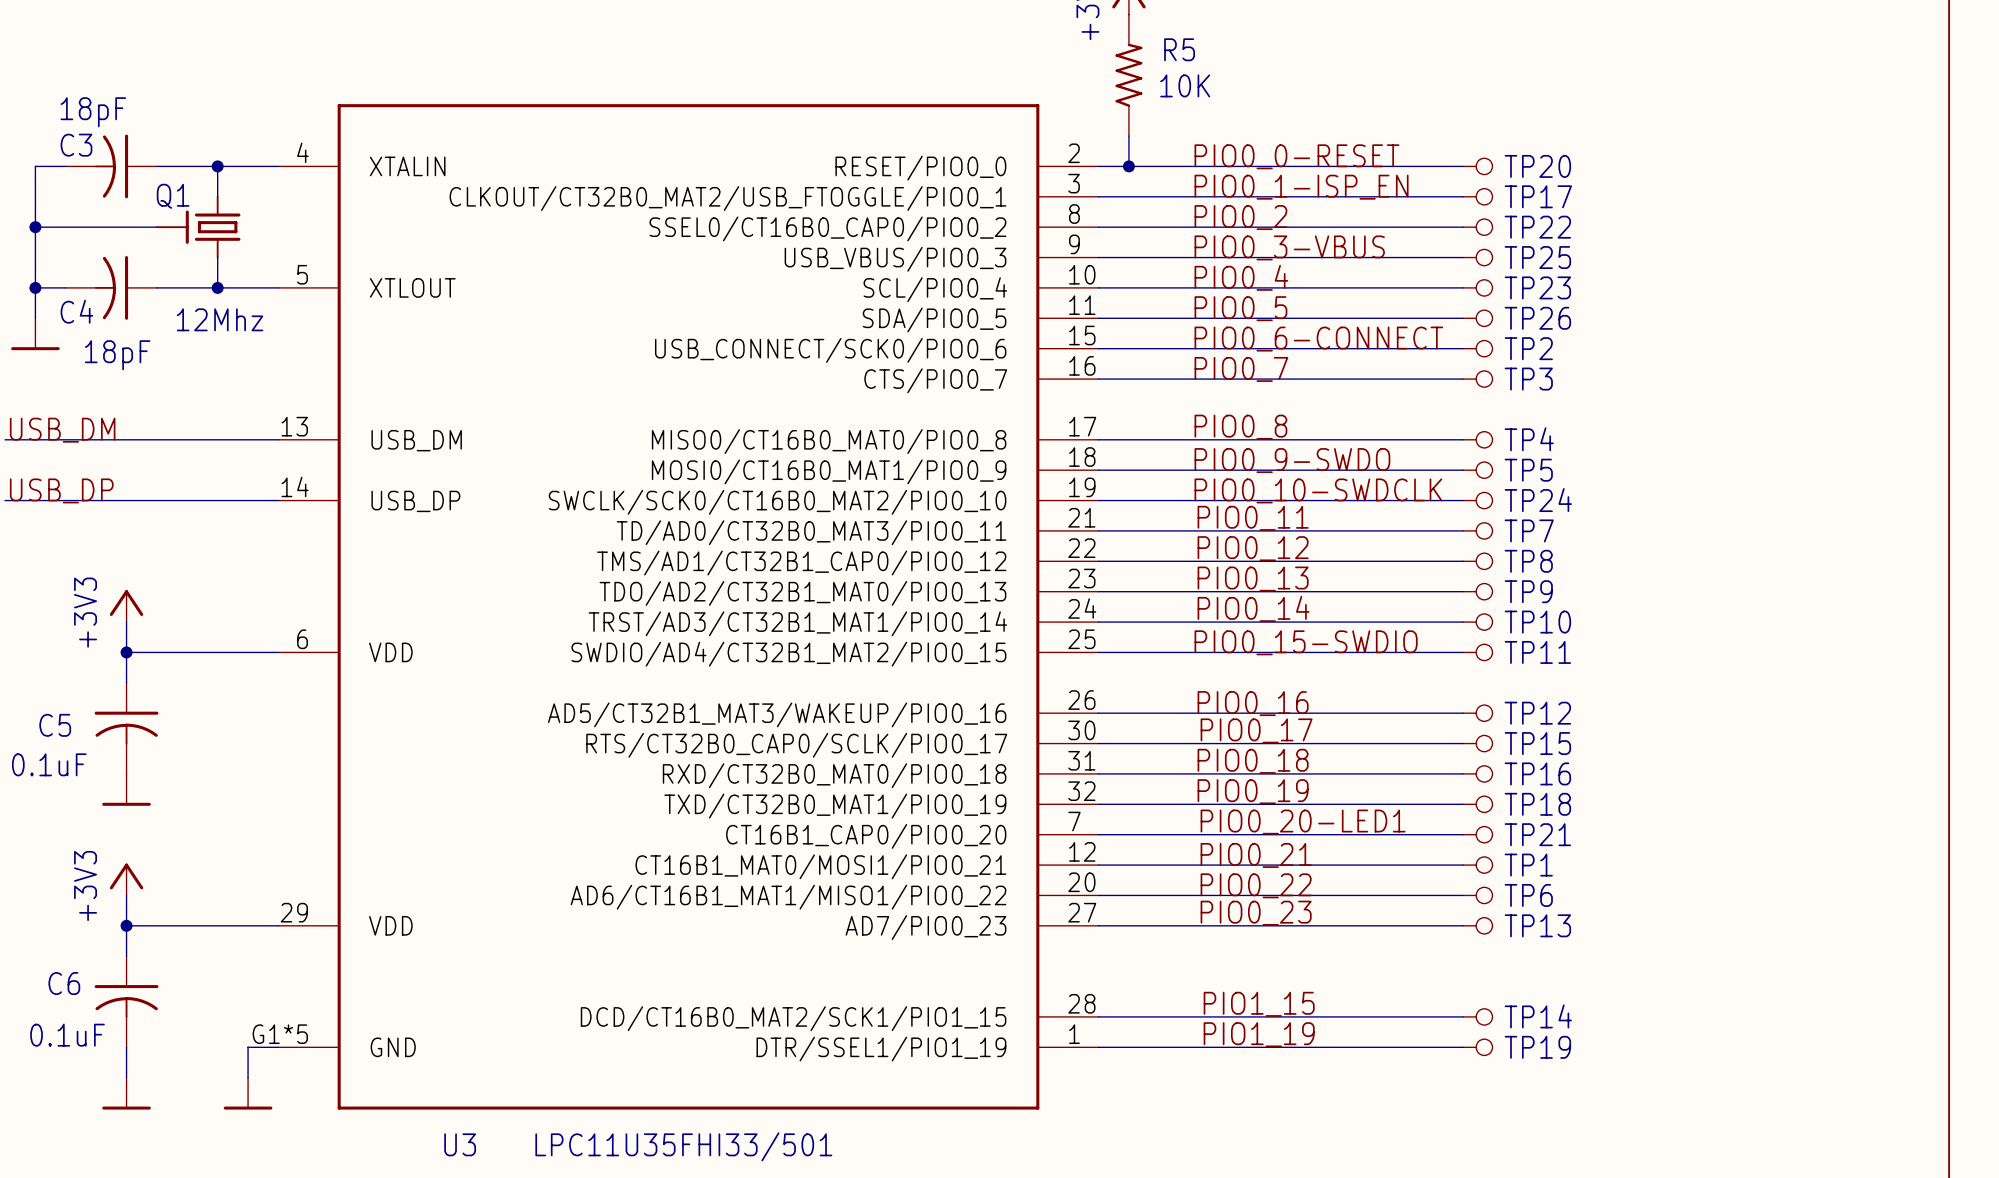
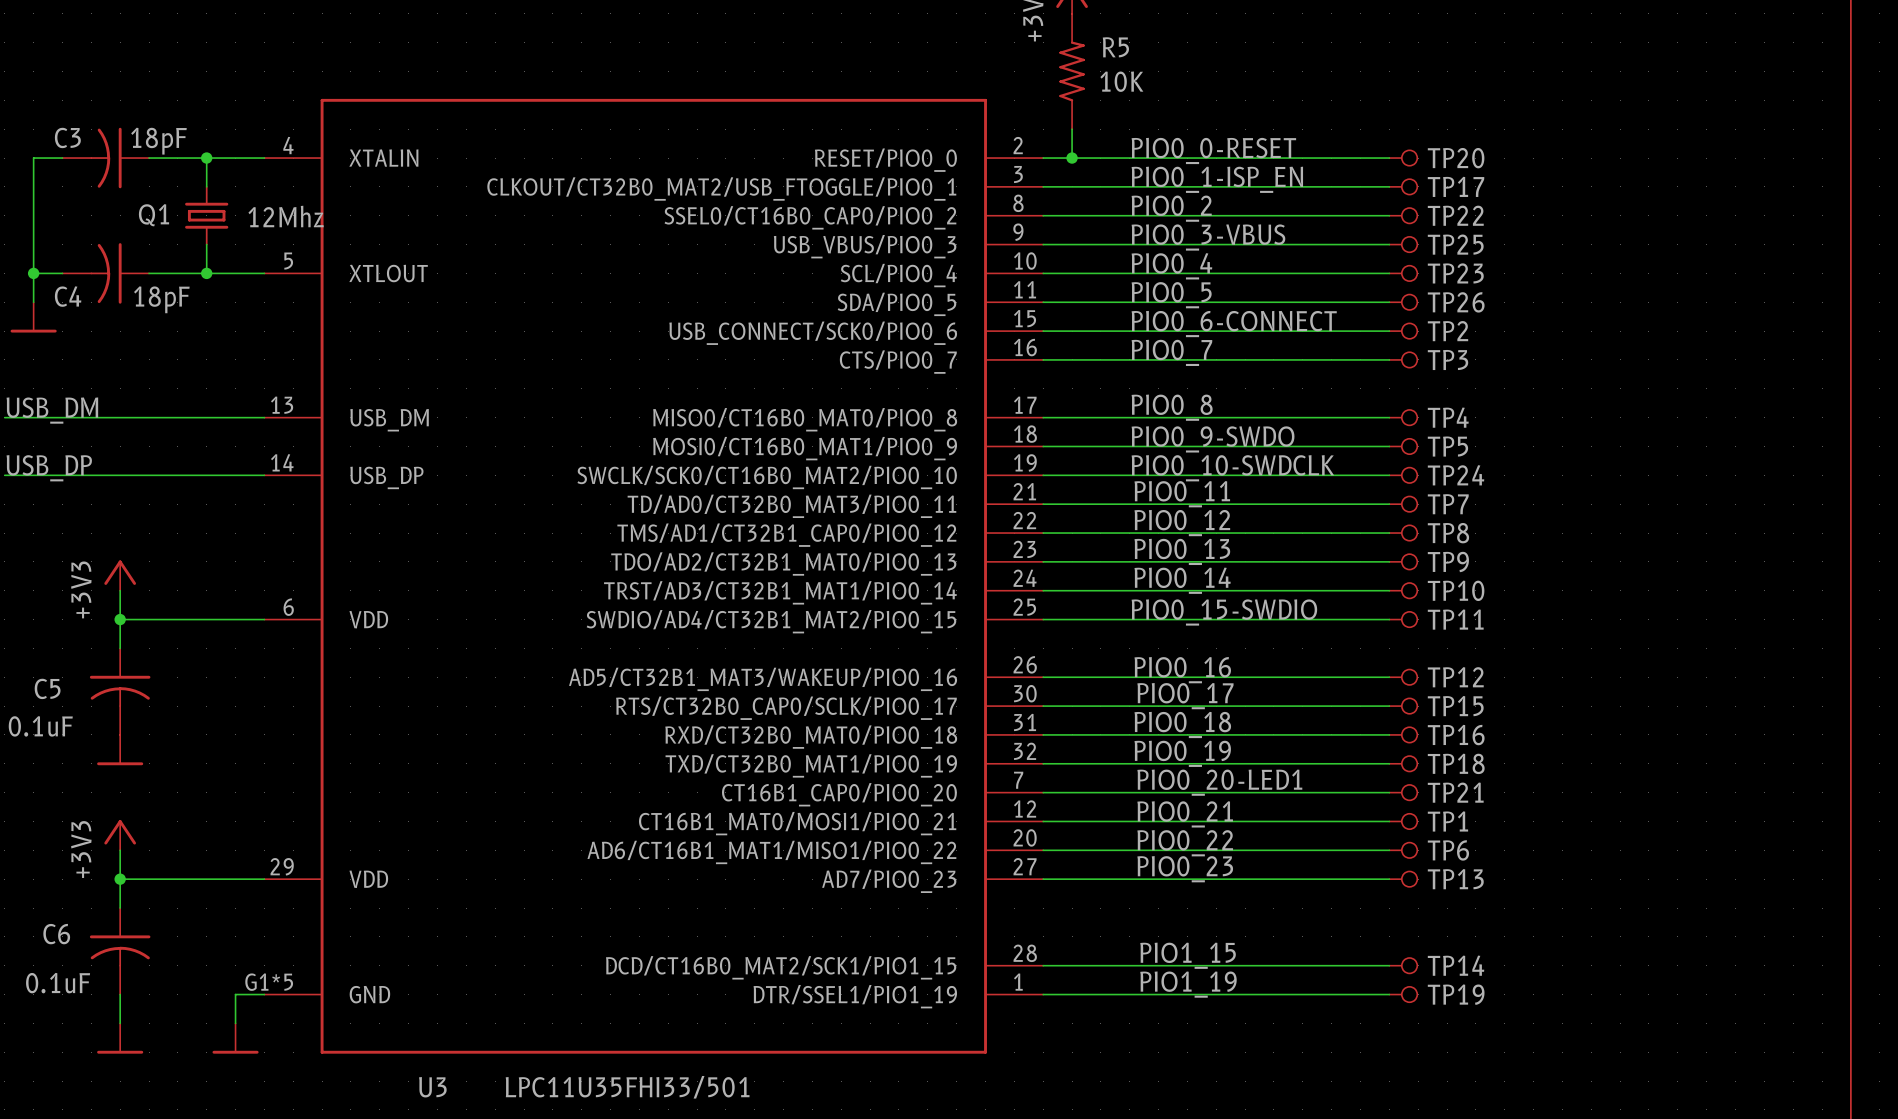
C3 value position: 18pF (93, 112) -> 18pF (158, 141)
Q1 symbol: [156, 195, 241, 259] -> [185, 186, 229, 246]
Q1 name position: Q1 (173, 196) -> Q1 (153, 215)
wire: (35, 227) (156, 227) -> none
junction: (35, 227) -> none
Q1 value position: 12Mhz (220, 319) -> 12Mhz (286, 216)
C4 value position: 18pF (117, 355) -> 18pF (161, 299)

